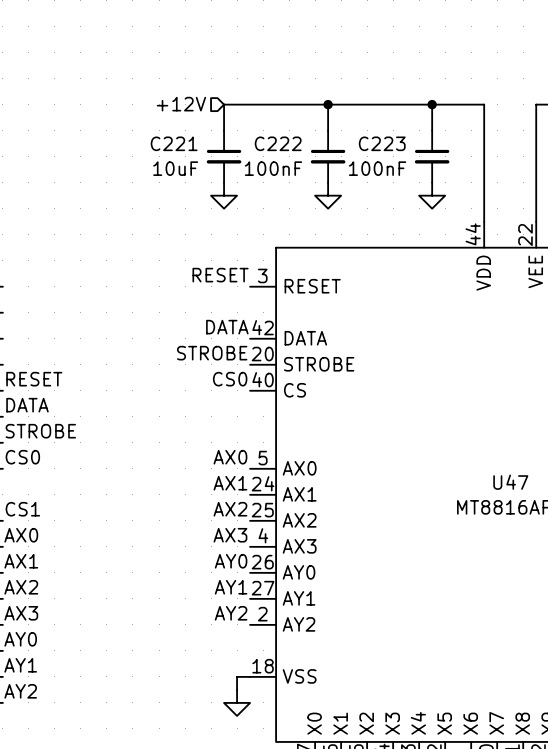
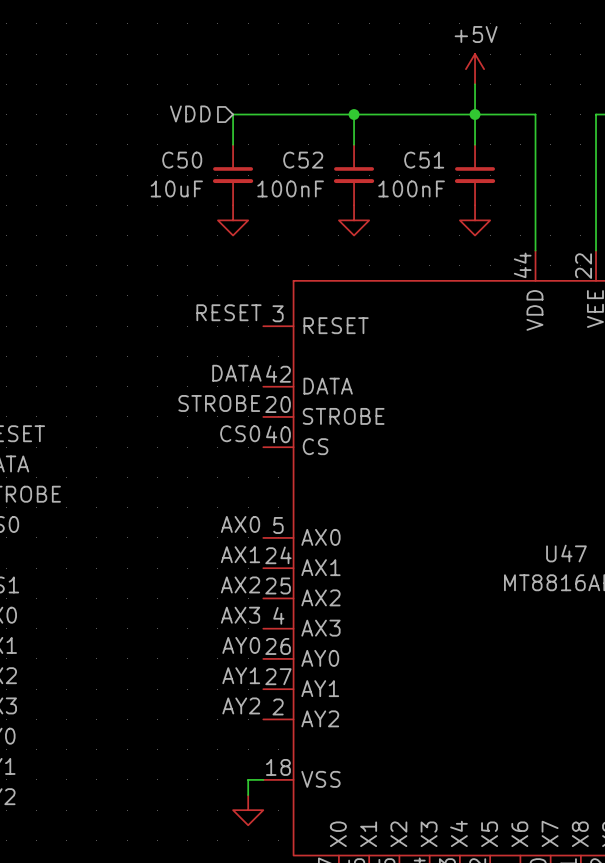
power symbol: none -> +5V (475, 69)
wire: none -> (475, 84) (475, 114)
hierarchical label: +12V (181, 104) -> VDD (190, 113)
C221 name: C221 (174, 143) -> C50 (182, 160)
C222 name: C222 (278, 143) -> C52 (303, 160)
C223 name: C223 (382, 143) -> C51 (424, 160)

